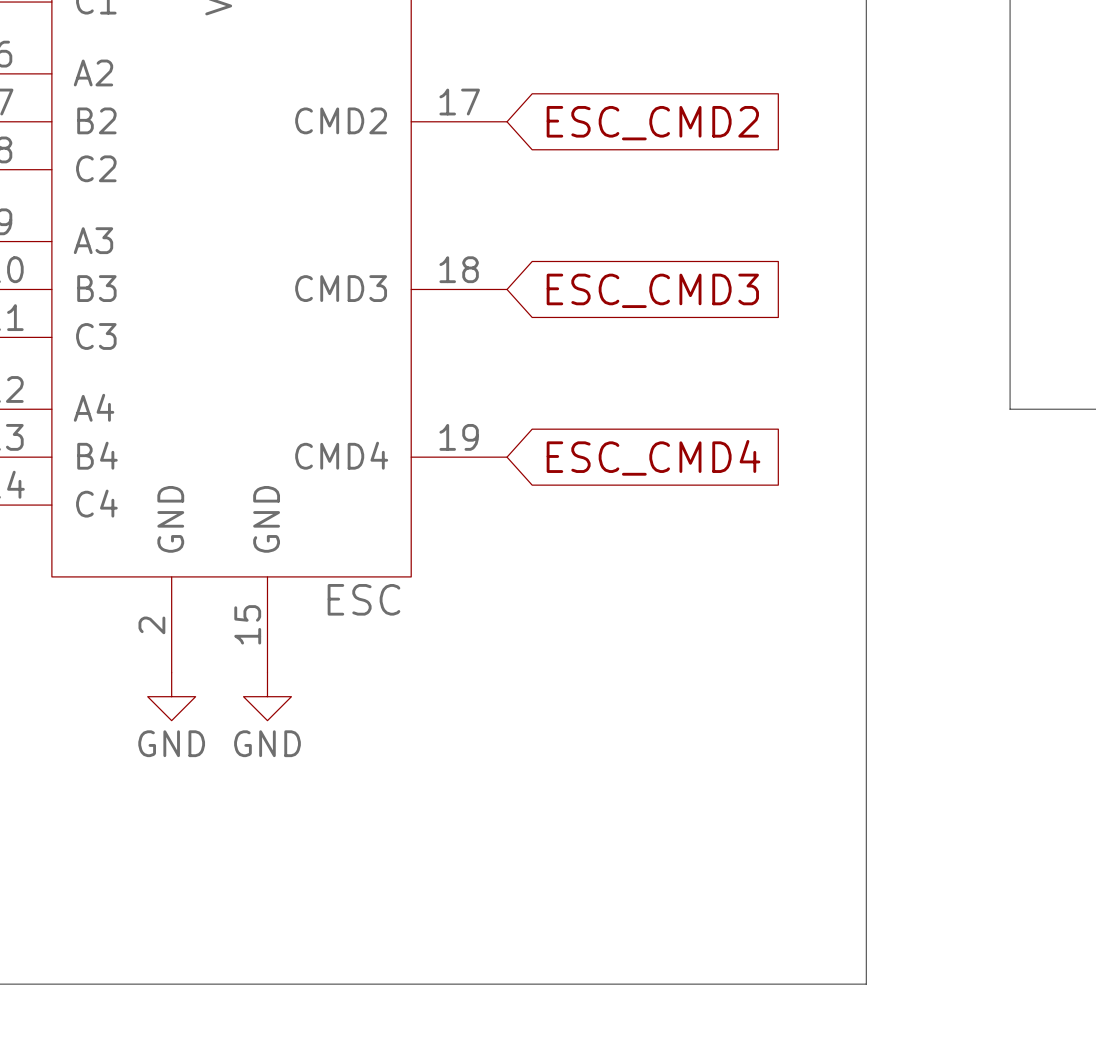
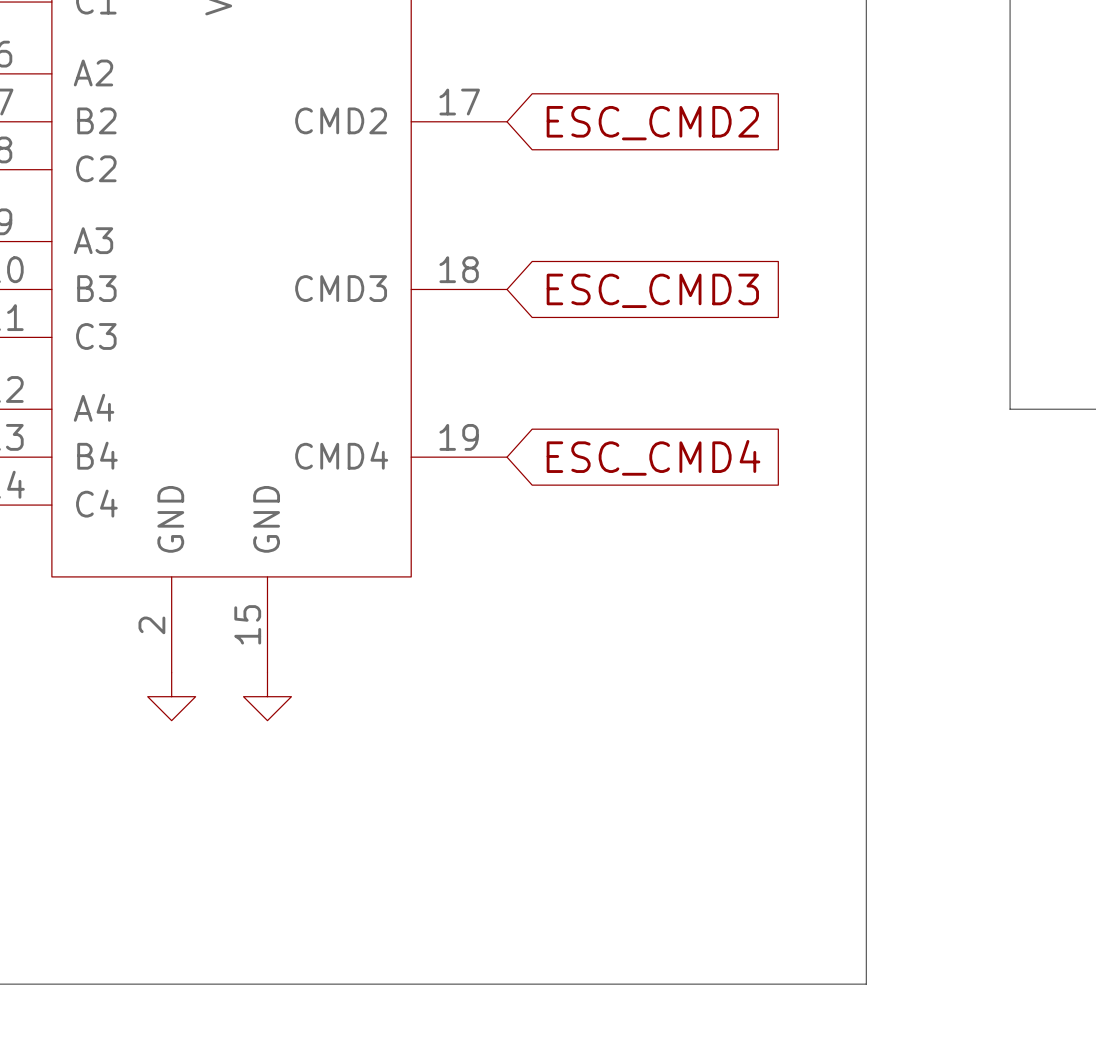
part value: ESC (363, 599) -> none
power symbol text: GND (171, 743) -> none
power symbol text: GND (267, 743) -> none

